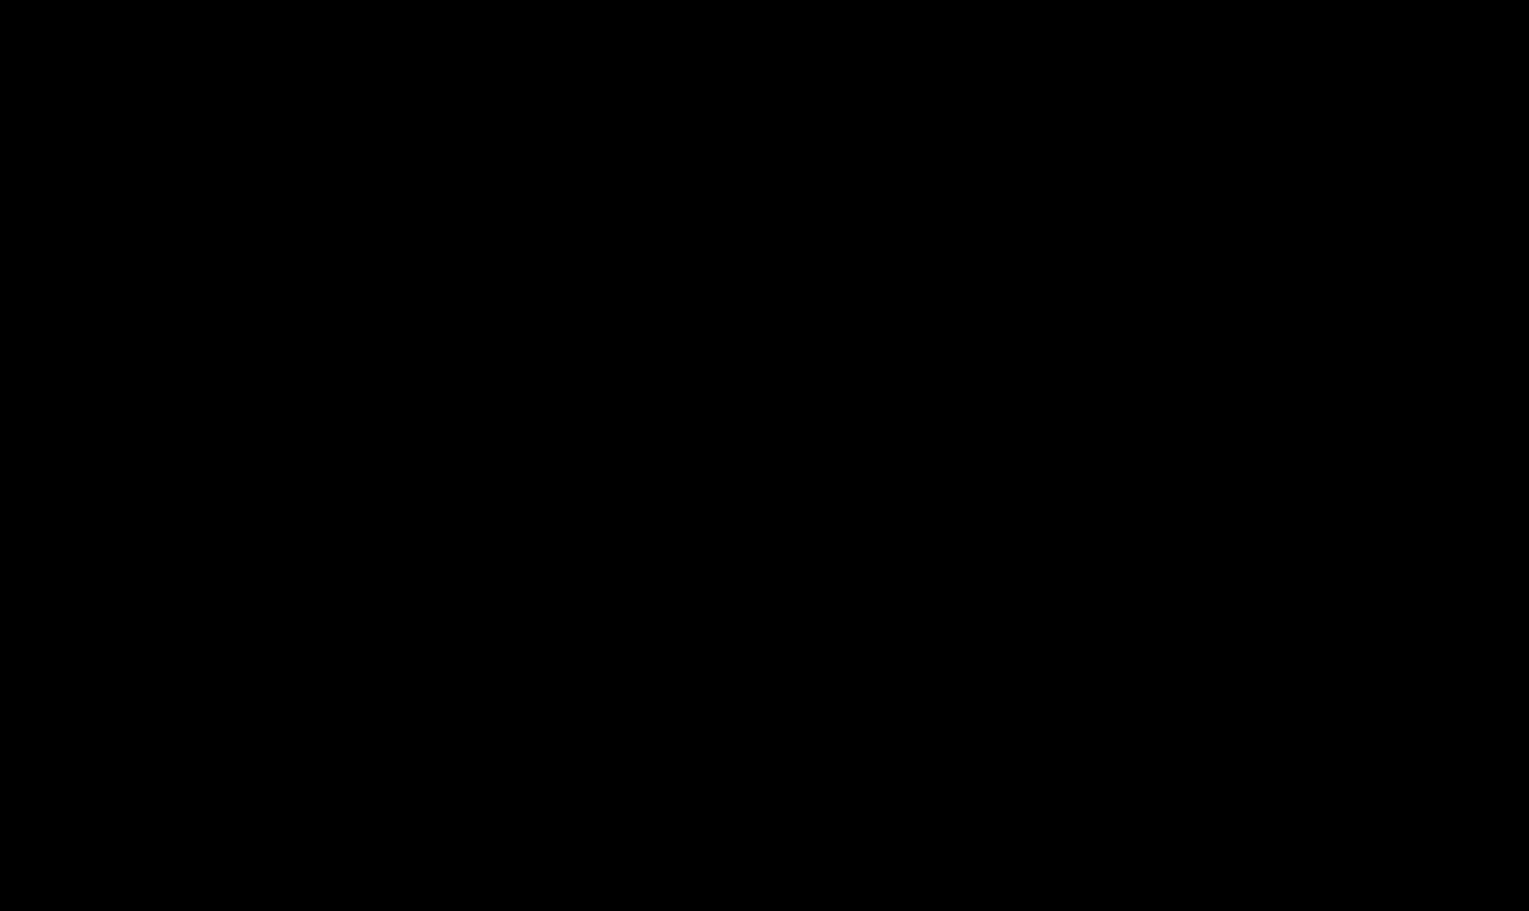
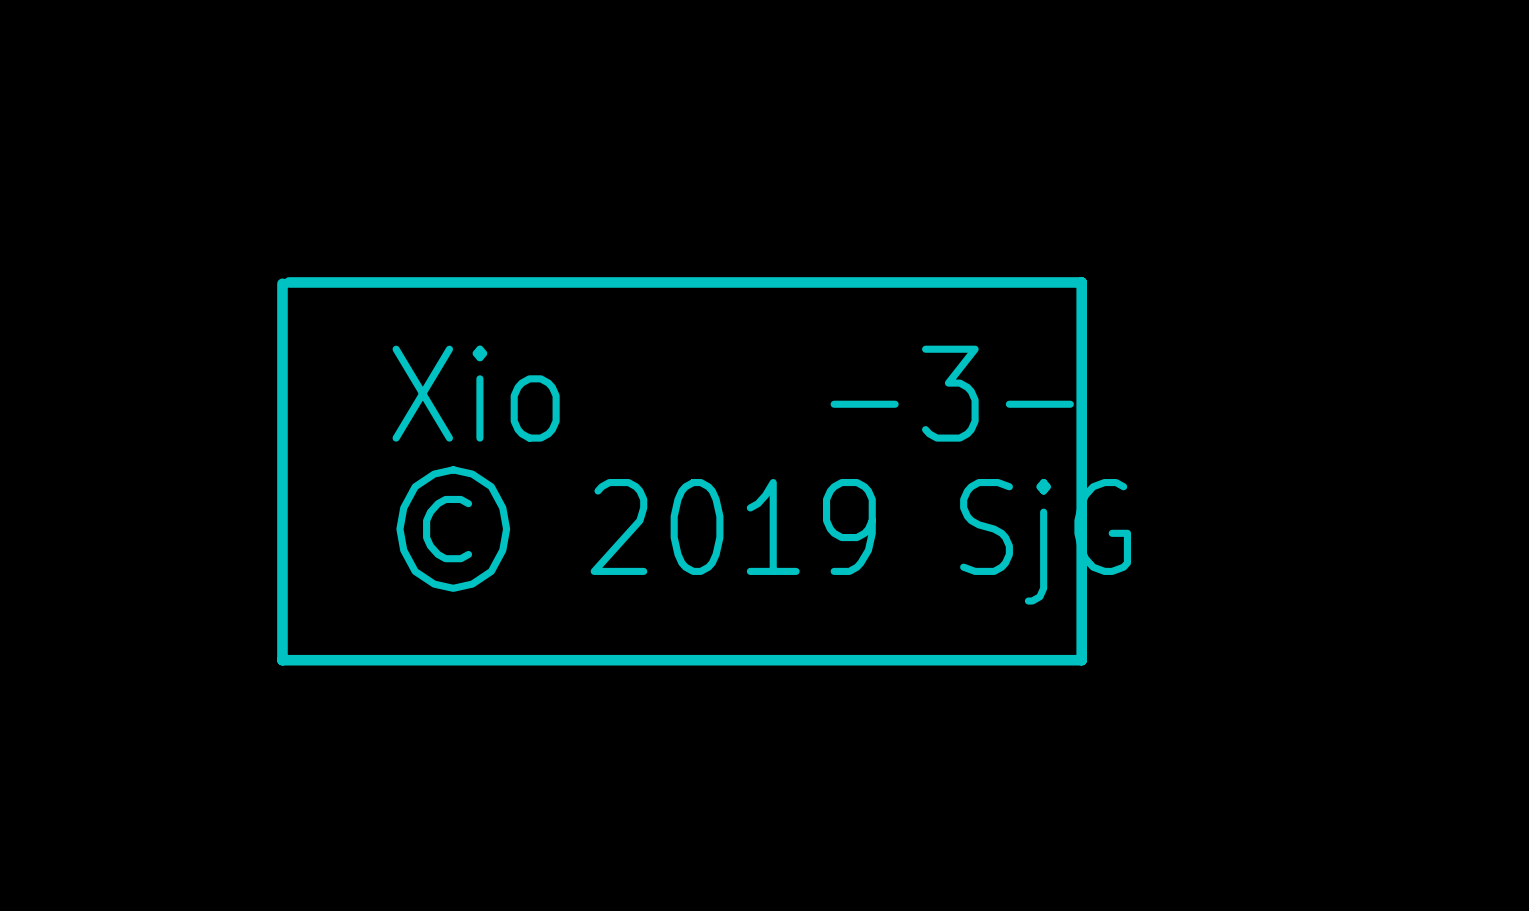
line: none -> (289, 282) (1081, 282) (1081, 660) (282, 660) (282, 283)
text: none -> Xio -3- (733, 393)
text: none -> © 2019 SjG (763, 535)

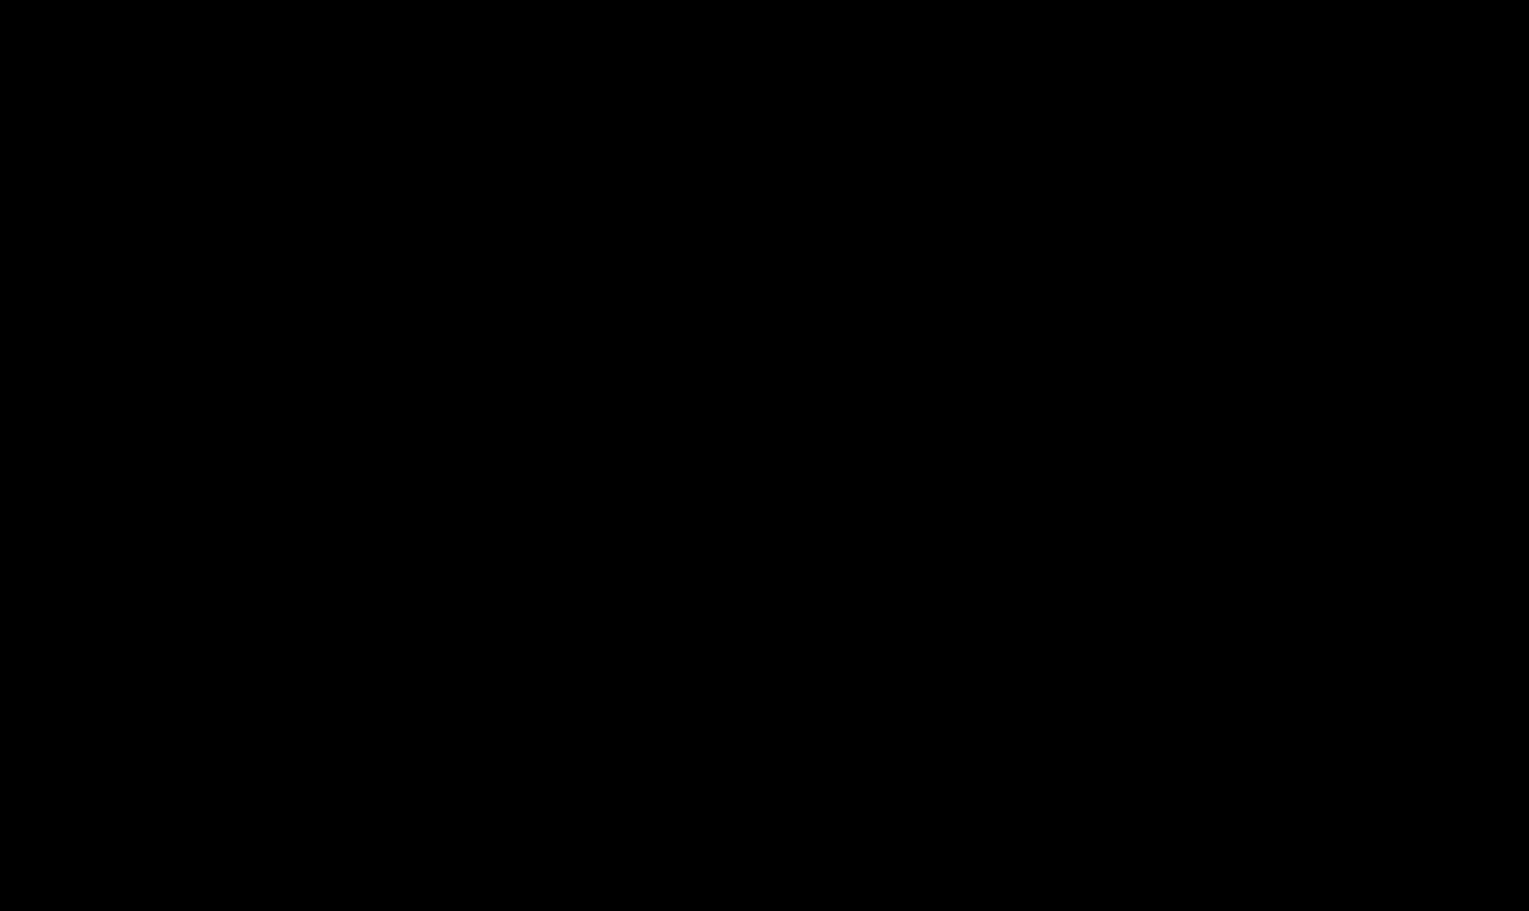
line: (289, 282) (1081, 282) (1081, 660) (282, 660) (282, 283) -> none
text: Xio -3- (733, 393) -> none
text: © 2019 SjG (763, 535) -> none

